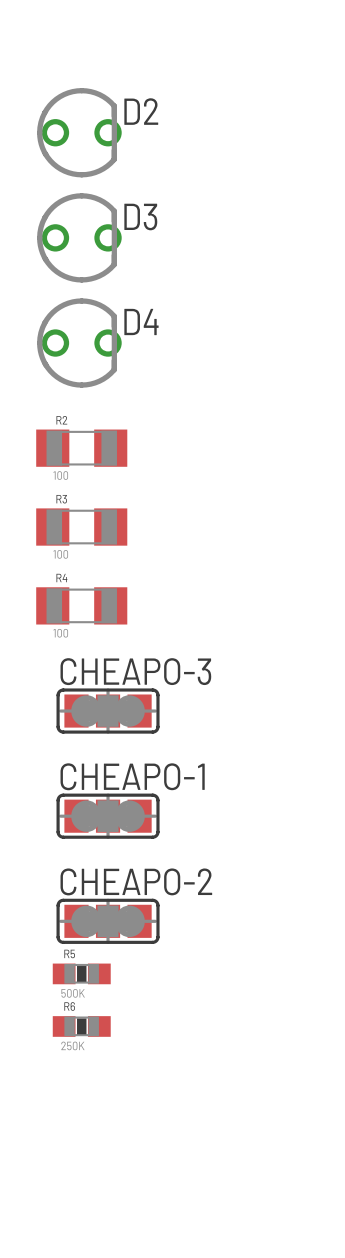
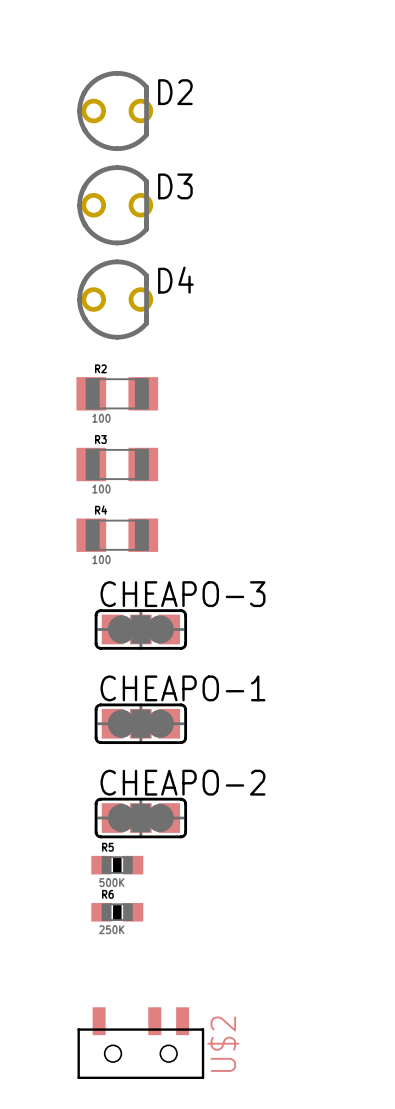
U$2: none -> (140, 1043)

